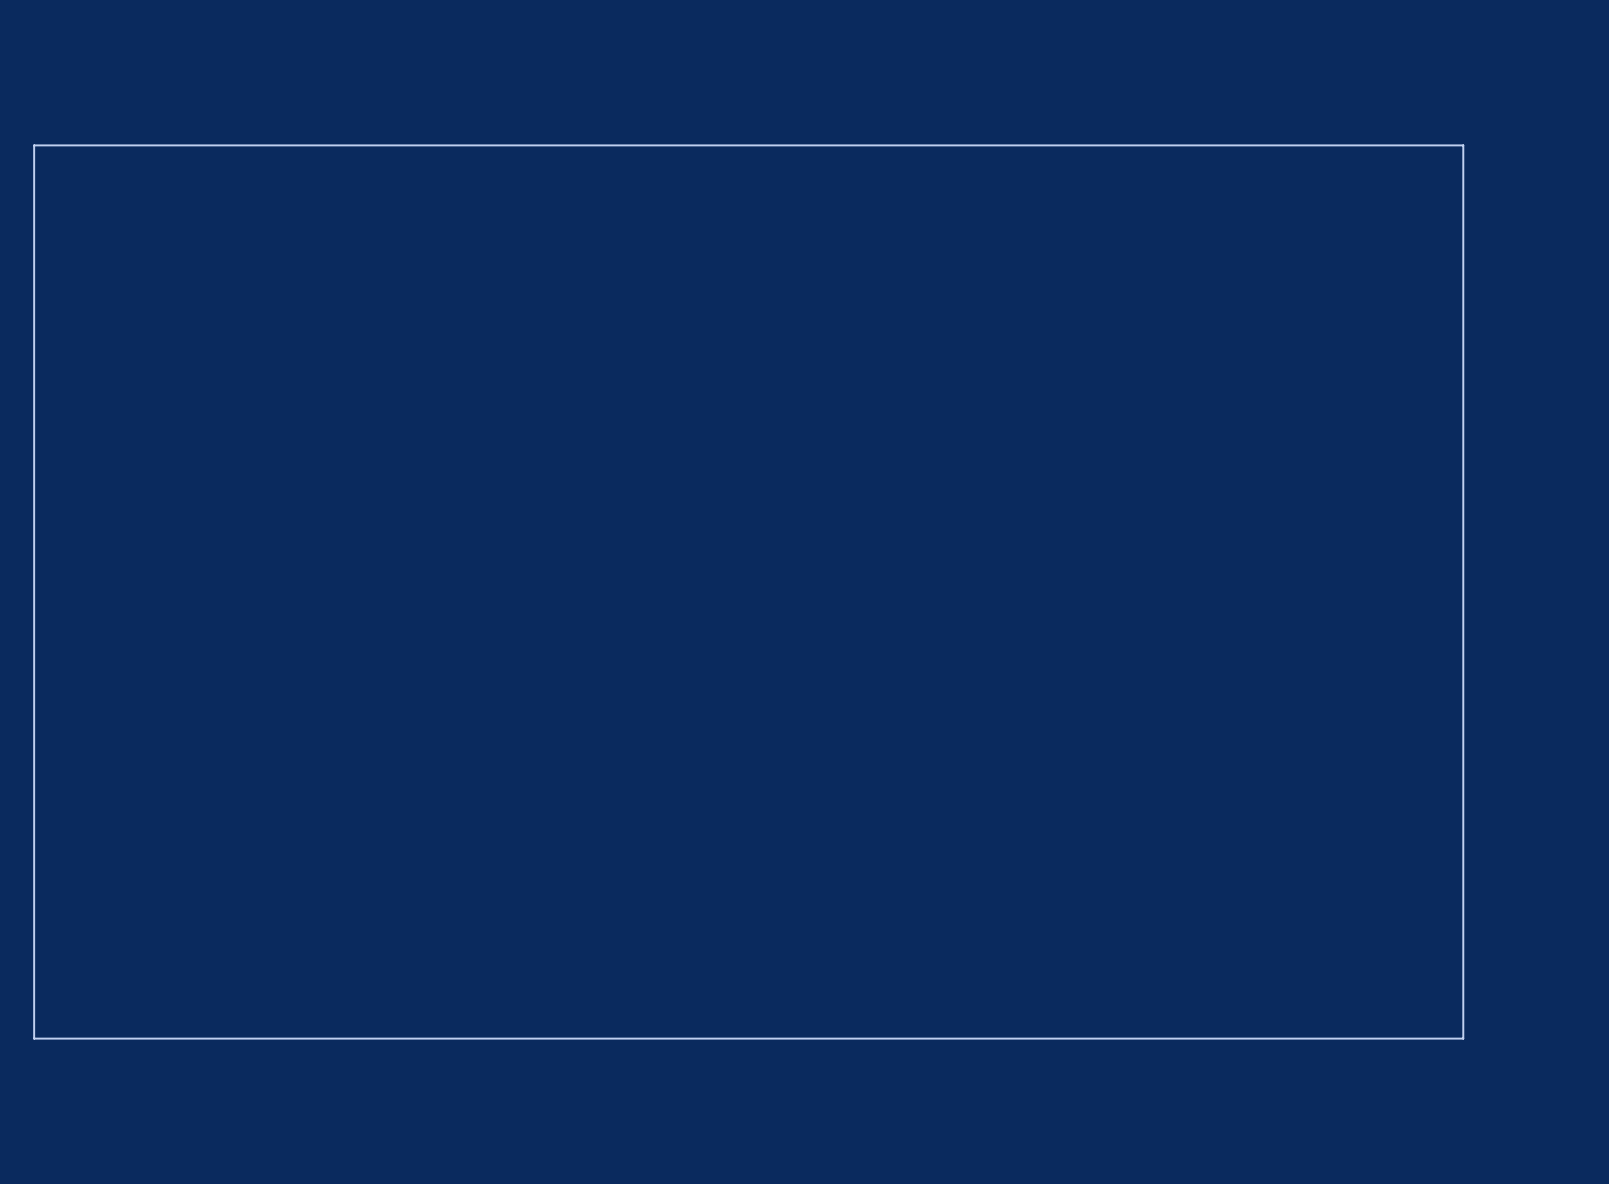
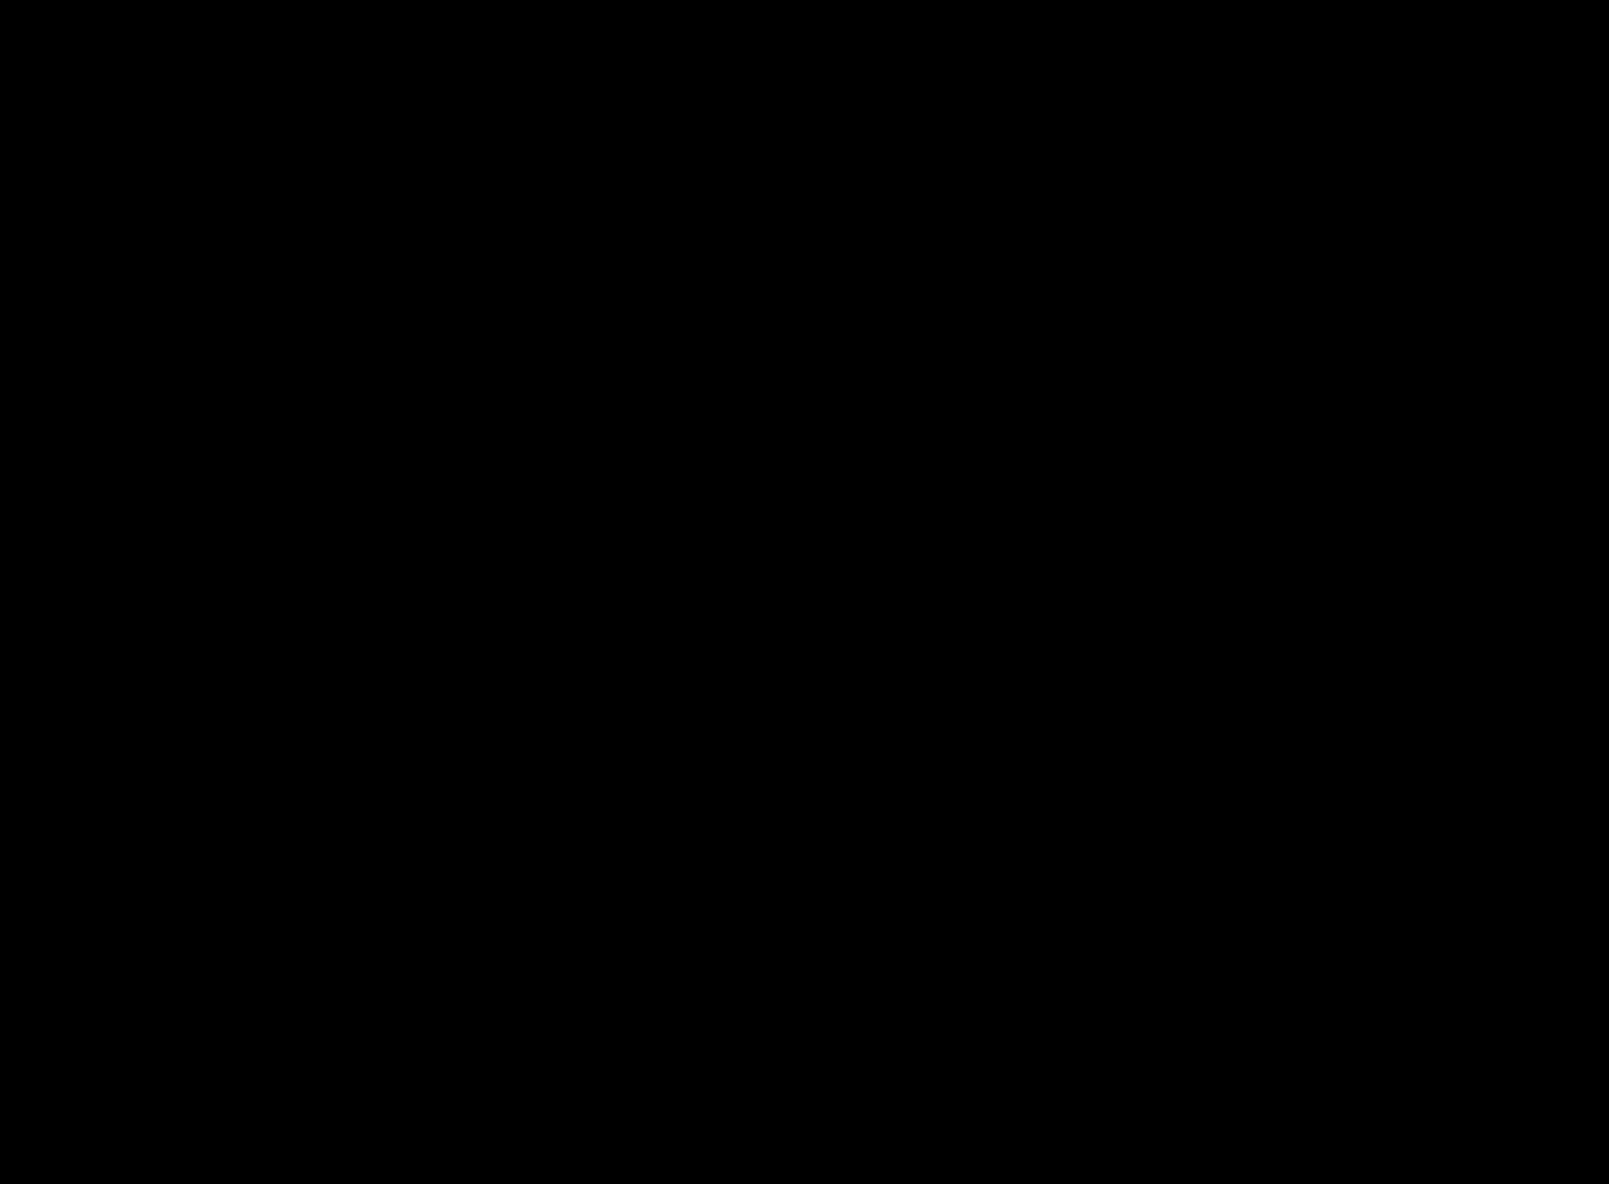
board edge: (34, 145) (34, 1038) (1463, 1038) (1463, 145) (34, 145) -> none

